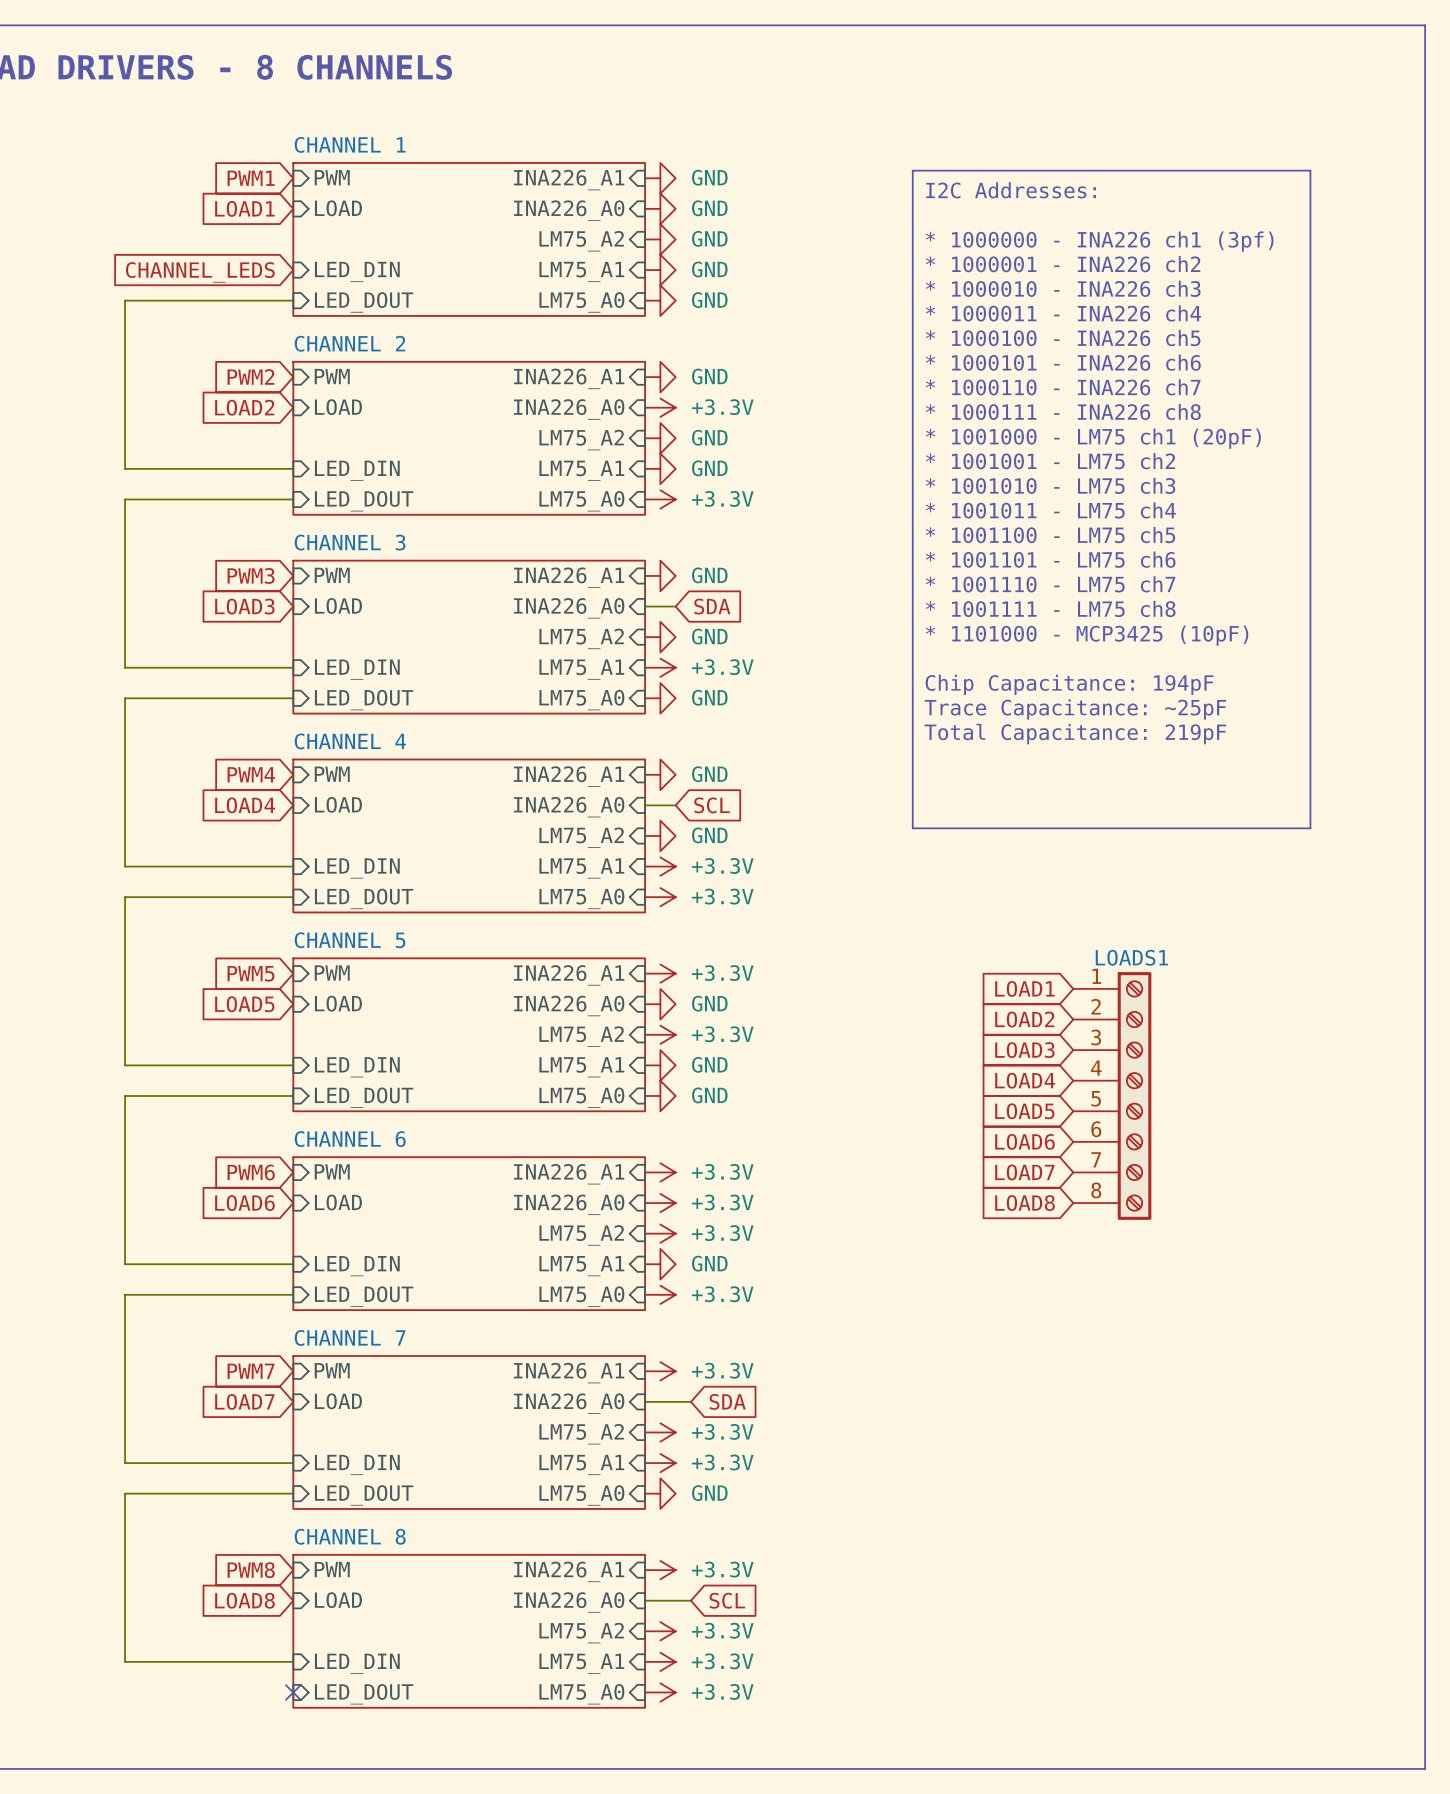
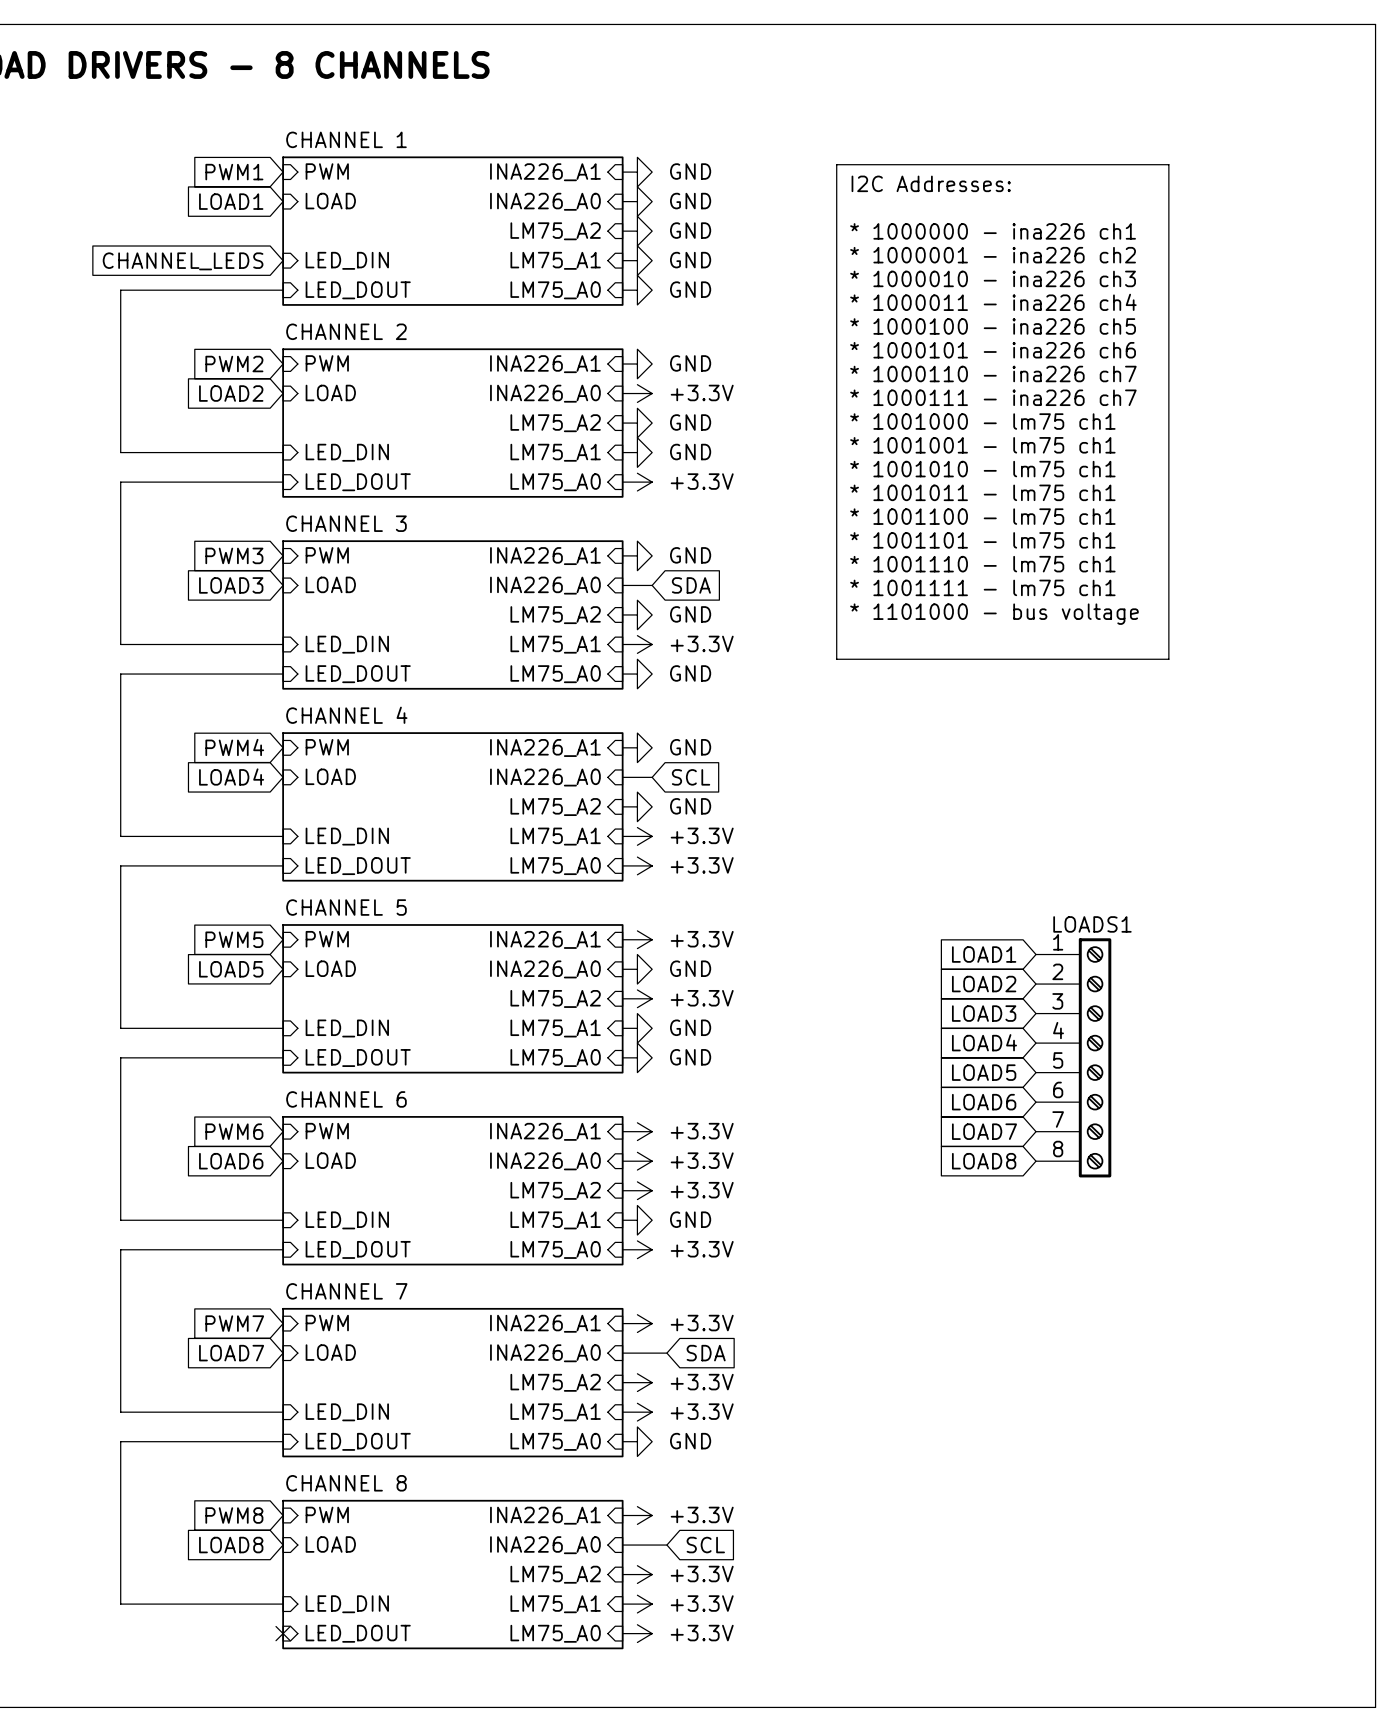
line: (912, 170) (912, 828) (1310, 828) (1310, 170) (1211, 170) -> (880, 164) (836, 164) (836, 659) (1168, 659) (1168, 164)
text position: I2C Addresses: (1011, 190) -> I2C Addresses: (931, 183)
text: none -> * 1000000 - ina226 ch1 (993, 231)
text: * 1000000 - INA226 ch1 (3pf) (1099, 241) -> none
text: none -> * 1000001 - ina226 ch2 (993, 255)
text: * 1000001 - INA226 ch2 (1063, 264) -> none
text: none -> * 1000010 - ina226 ch3 (993, 278)
text: * 1000010 - INA226 ch3 (1063, 288) -> none
text: none -> * 1000011 - ina226 ch4 (993, 302)
text: * 1000011 - INA226 ch4 (1063, 313) -> none
text: none -> * 1000100 - ina226 ch5 (993, 326)
text: * 1000100 - INA226 ch5 (1063, 338) -> none
text: none -> * 1000101 - ina226 ch6 (993, 350)
text: * 1000101 - INA226 ch6 (1063, 362) -> none
text: none -> * 1000110 - ina226 ch7 (993, 374)
text: * 1000110 - INA226 ch7 (1063, 387) -> none
text: none -> * 1000111 - ina226 ch7 (993, 397)
text: * 1000111 - INA226 ch8 (1063, 411) -> none
text: none -> * 1001000 - lm75 ch1 (982, 421)
text: * 1001000 - LM75 ch1 (20pF) (1093, 438) -> none
text: none -> * 1001001 - lm75 ch1 (982, 445)
text: * 1001001 - LM75 ch2 (1050, 461) -> none
text: none -> * 1001010 - lm75 ch1 (982, 469)
text: * 1001010 - LM75 ch3 (1050, 485) -> none
text: none -> * 1001011 - lm75 ch1 (982, 492)
text: * 1001011 - LM75 ch4 (1050, 510) -> none
text: none -> * 1001100 - lm75 ch1 (982, 516)
text: * 1001100 - LM75 ch5 (1050, 535) -> none
text: none -> * 1001101 - lm75 ch1 (982, 540)
text: * 1001101 - LM75 ch6 (1050, 559) -> none
text: none -> * 1001110 - lm75 ch1 (982, 564)
text: * 1001110 - LM75 ch7 (1050, 584) -> none
text: none -> * 1001111 - lm75 ch1 (982, 587)
text: * 1001111 - LM75 ch8 (1050, 608) -> none
text: none -> * 1101000 - bus voltage (994, 614)
text: * 1101000 - MCP3425 (10pF) (1087, 635) -> none
text: Chip Capacitance: 194pF (1069, 684) -> none
text: Trace Capacitance: ~25pF (1075, 709) -> none
text: Total Capacitance: 219pF (1075, 734) -> none

